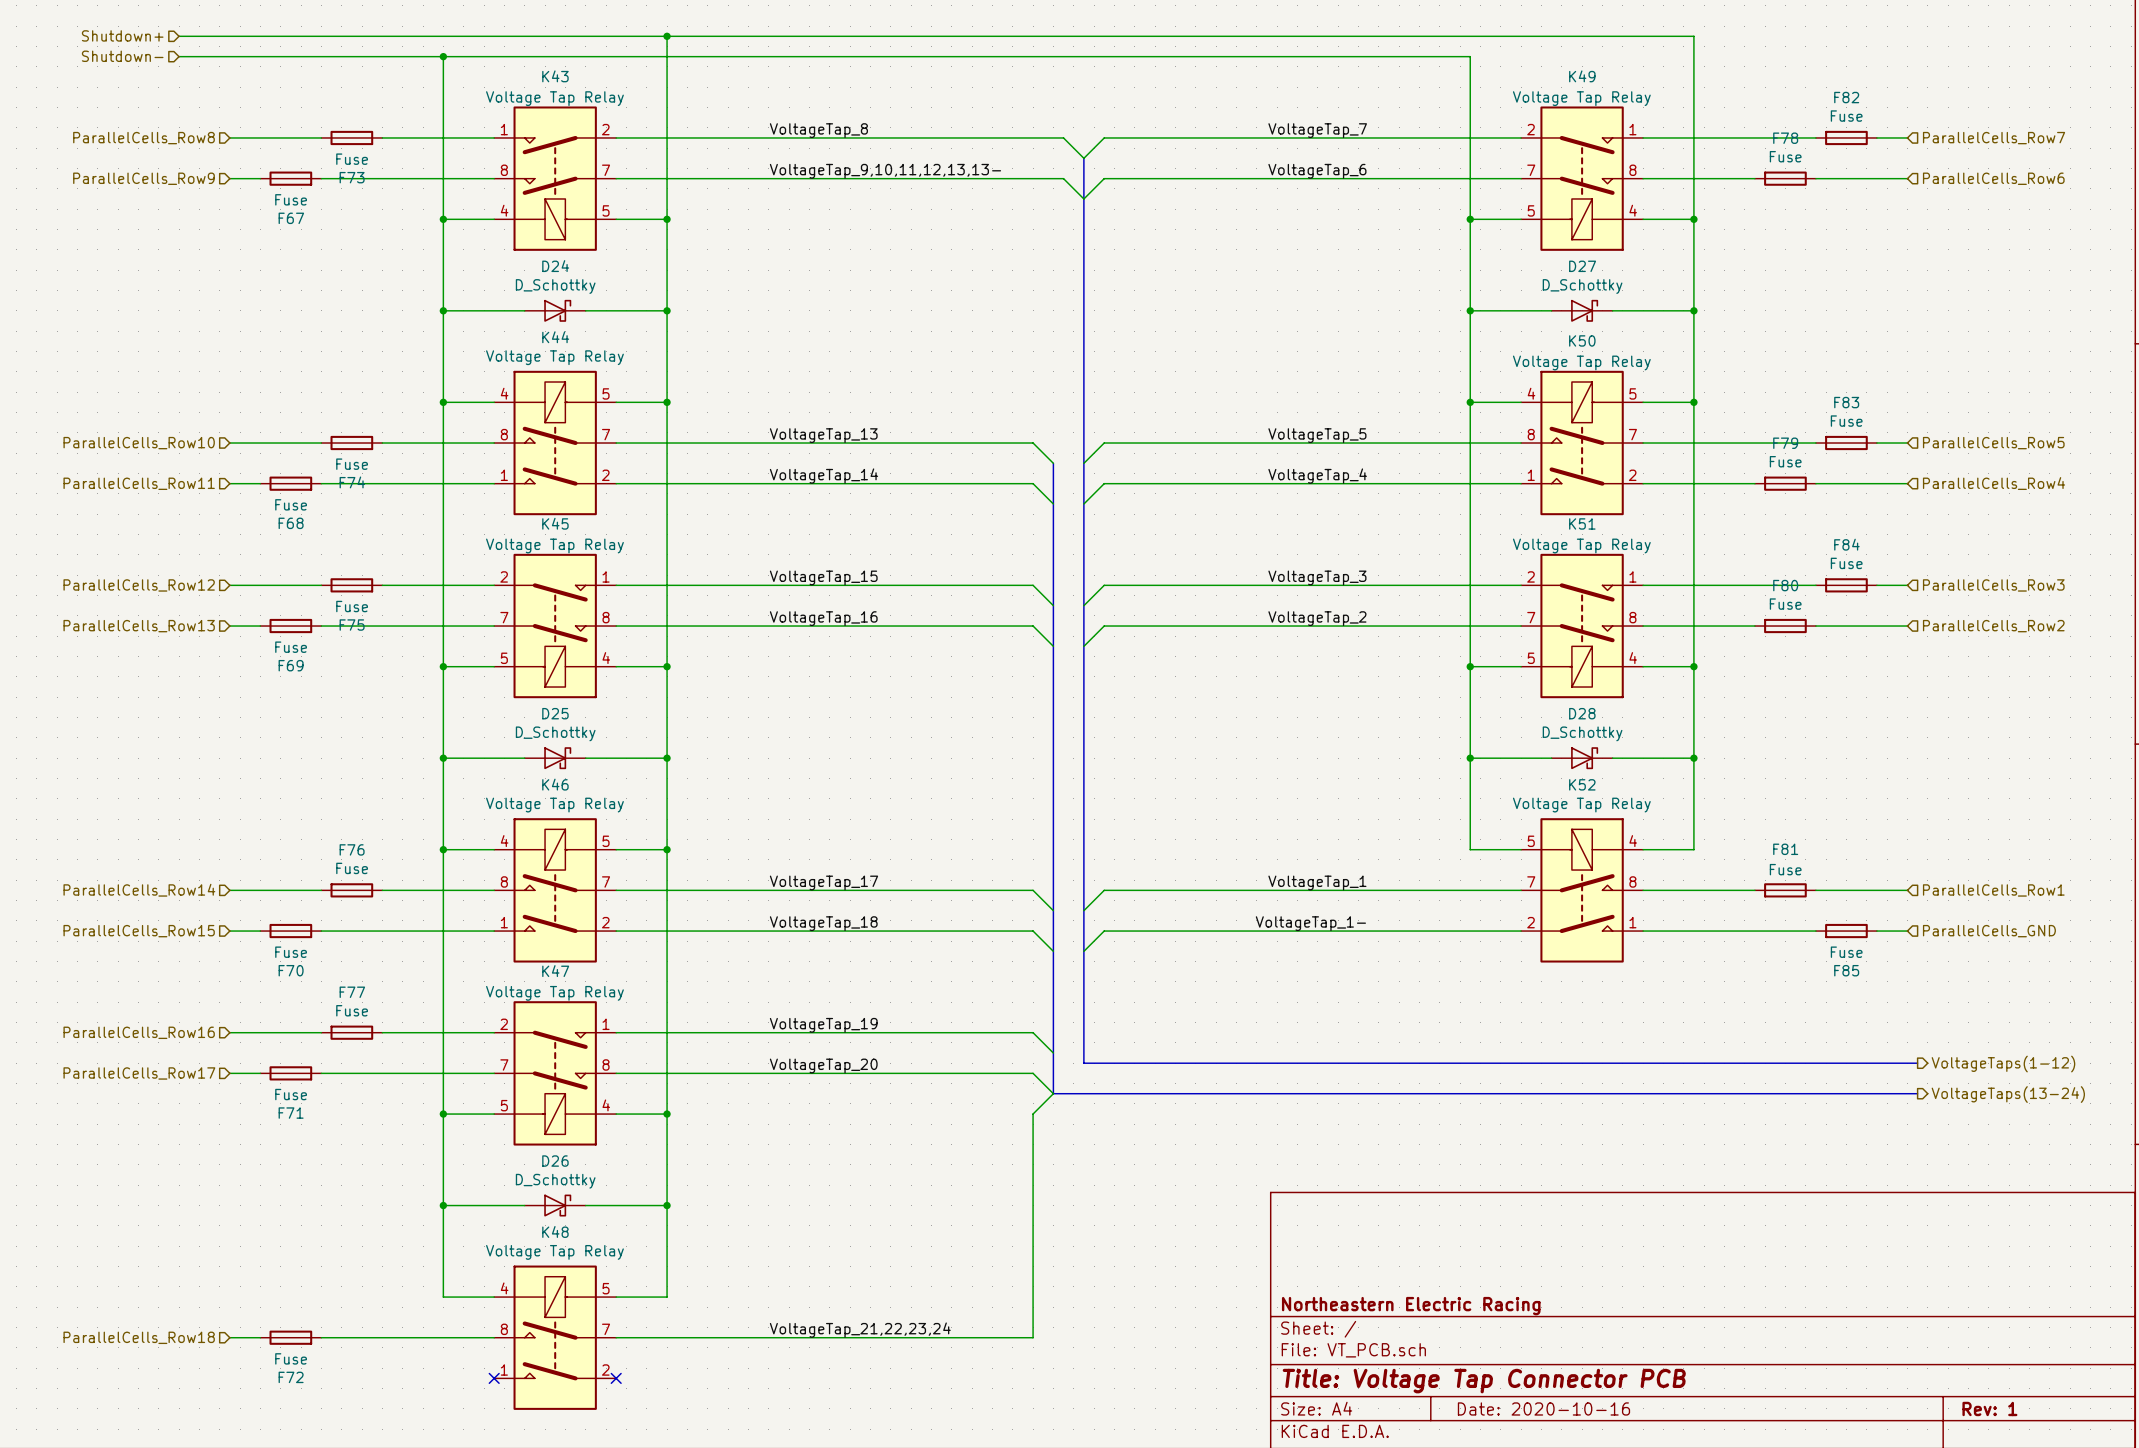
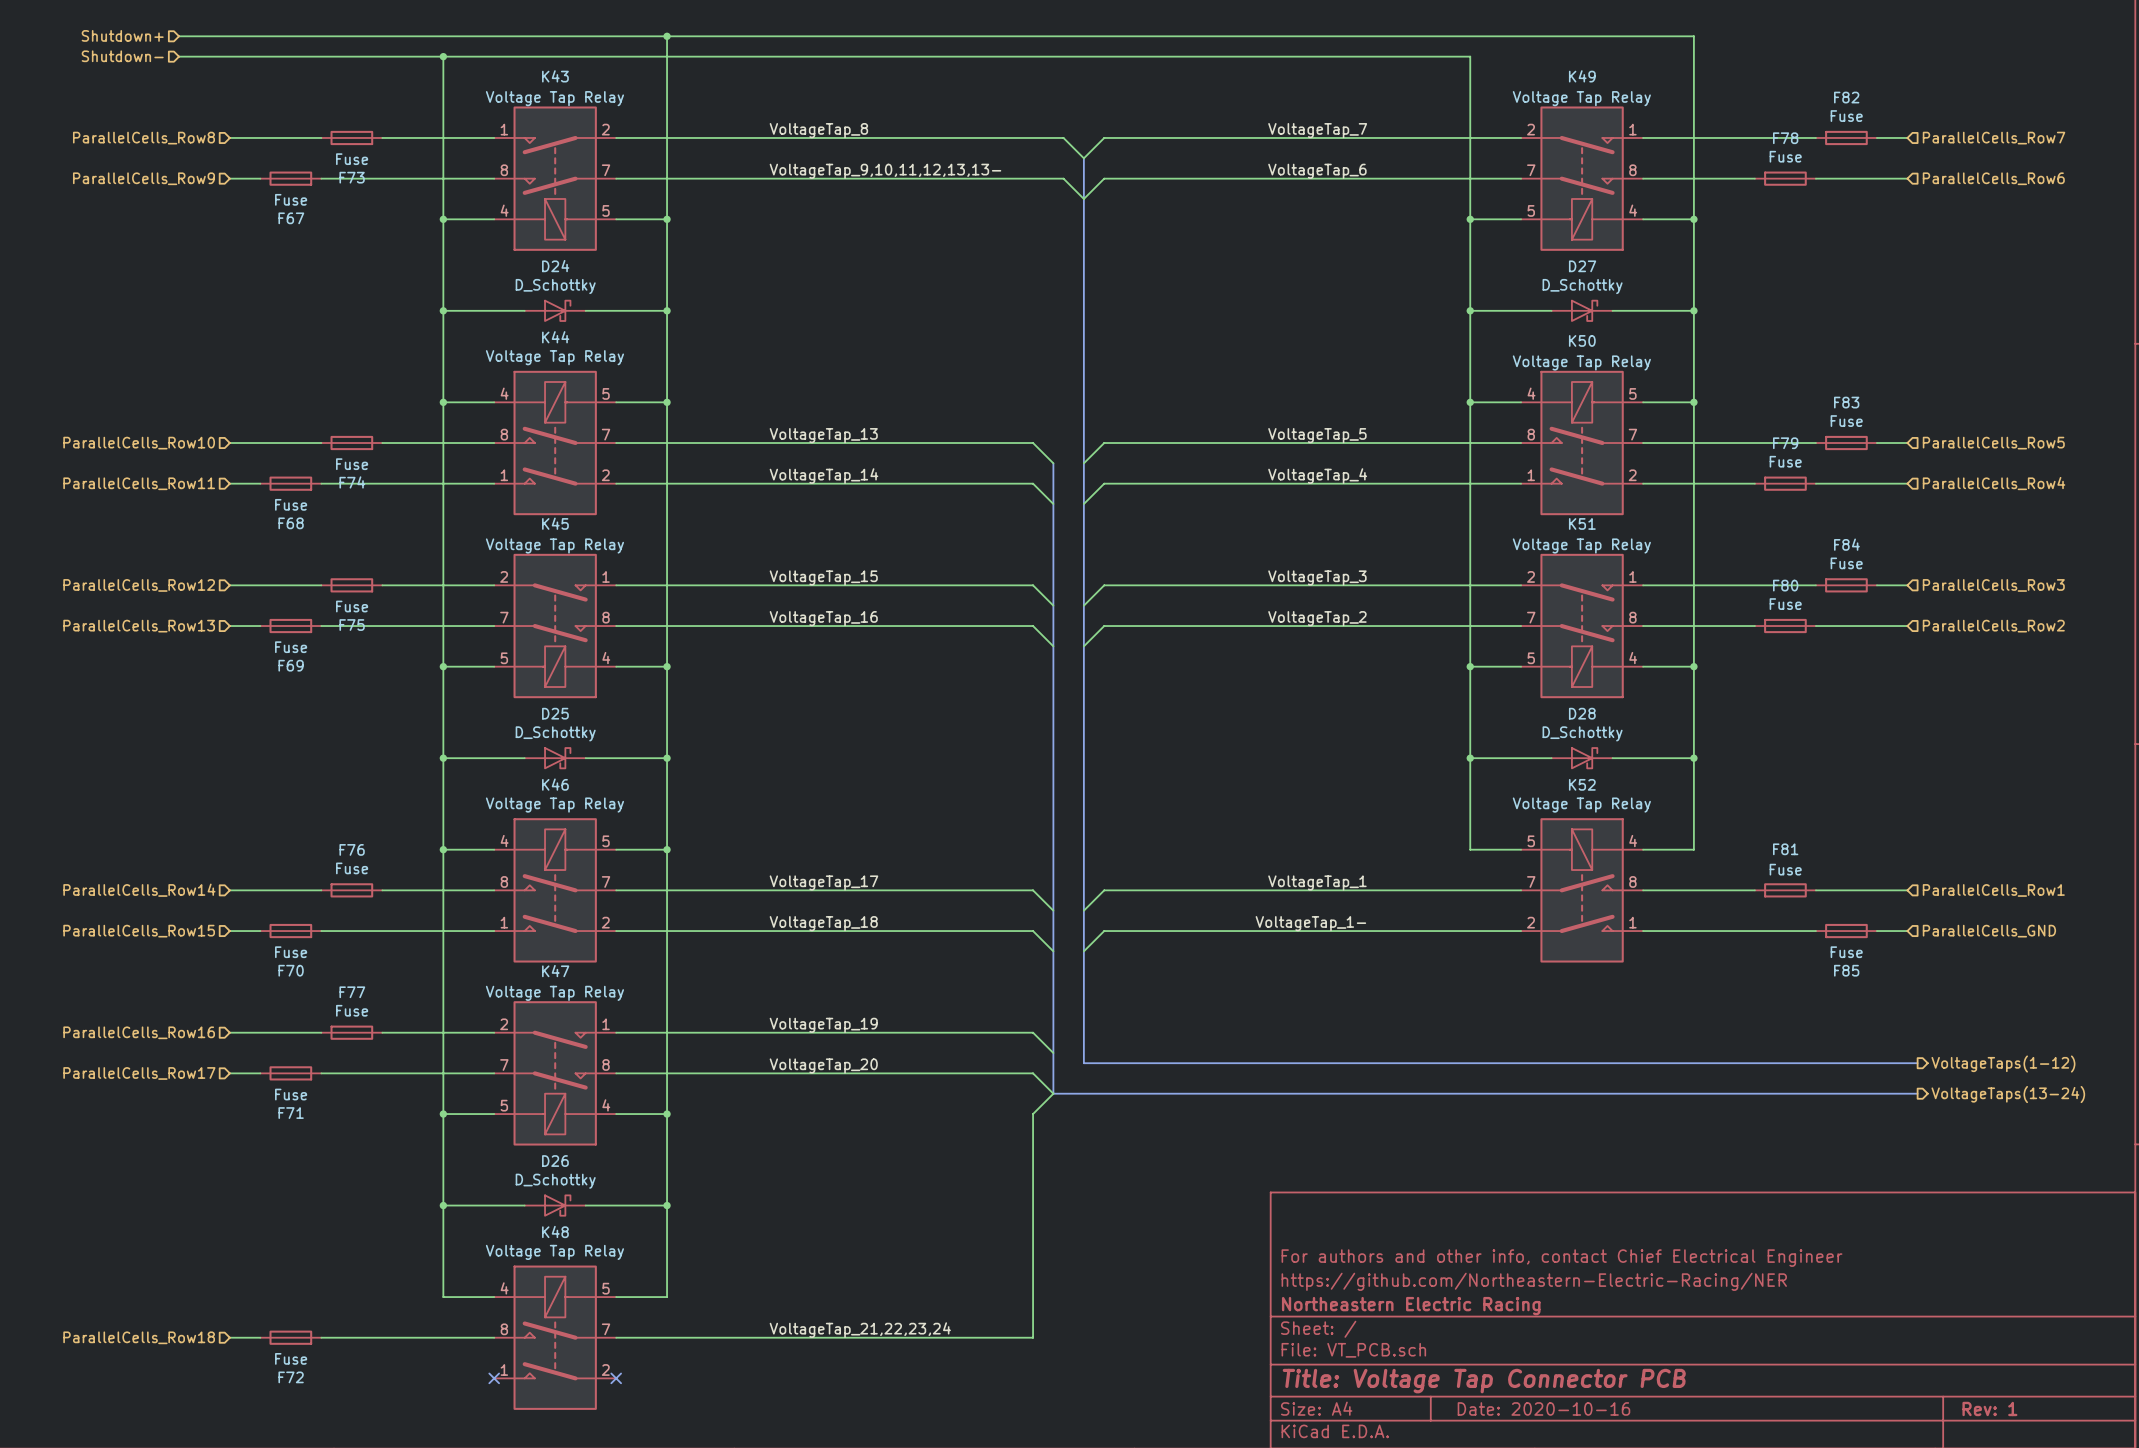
title block: none -> For authors and other info, contact Chief Electrical Engineer (1561, 1258)
title block: none -> https://github.com/Northeastern-Electric-Racing/NER (1534, 1281)

